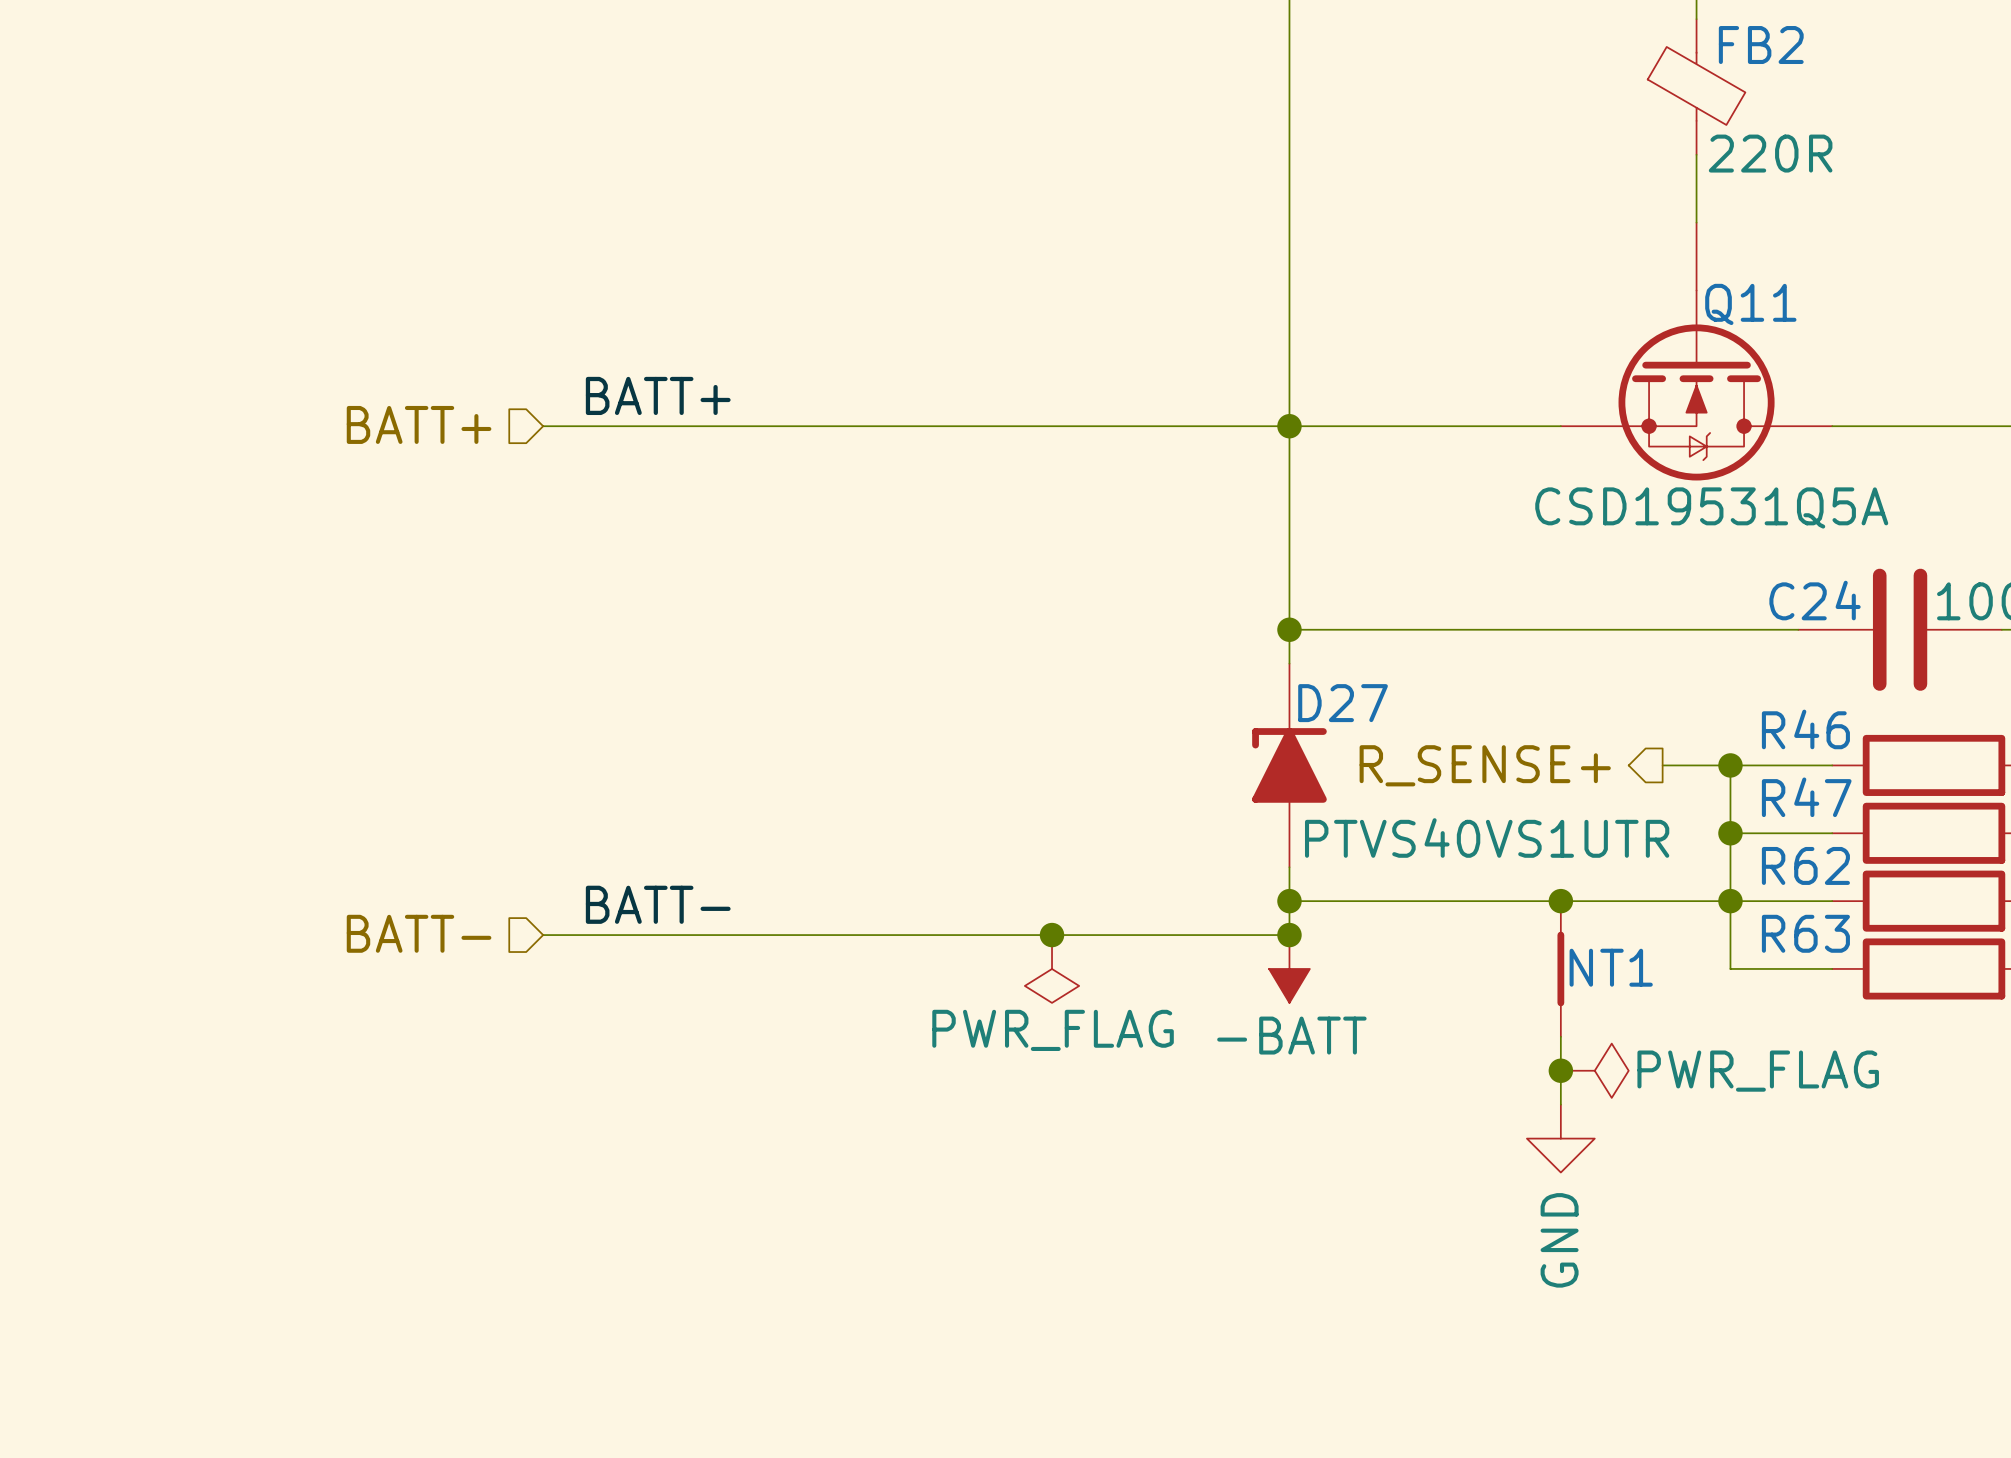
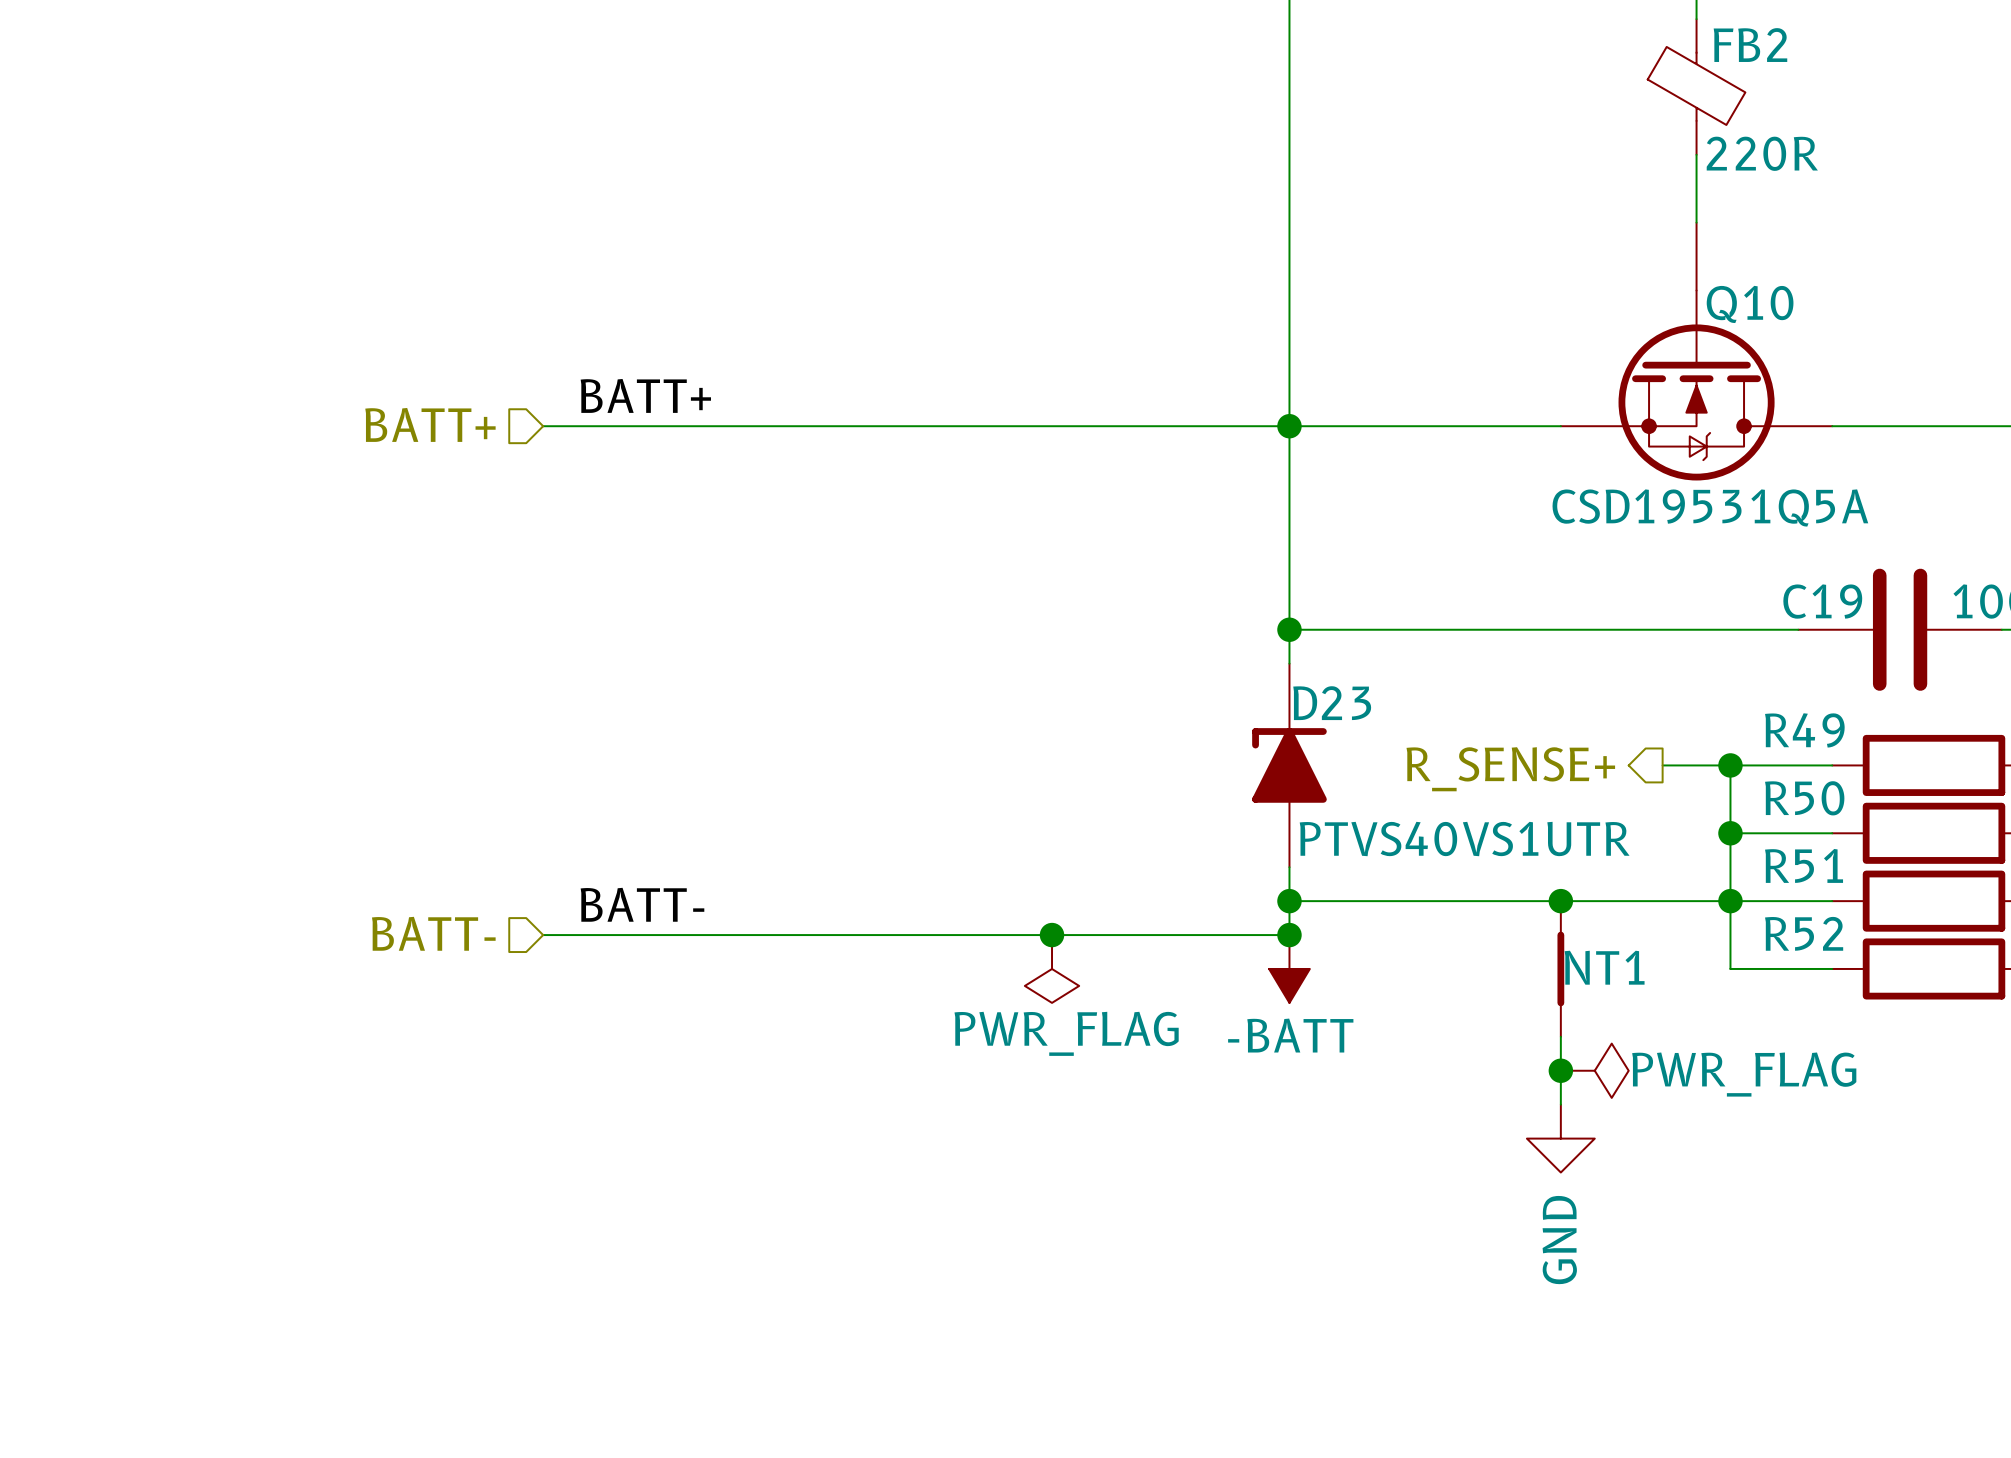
Q11 name: Q11 (1750, 304) -> Q10 (1750, 304)
C24 name: C24 (1815, 600) -> C19 (1822, 601)
D27 name: D27 (1343, 703) -> D23 (1332, 703)
R46 name: R46 (1805, 729) -> R49 (1804, 730)
R47 name: R47 (1806, 797) -> R50 (1804, 798)
R62 name: R62 (1805, 865) -> R51 (1804, 865)
R63 name: R63 (1805, 933) -> R52 (1804, 933)

